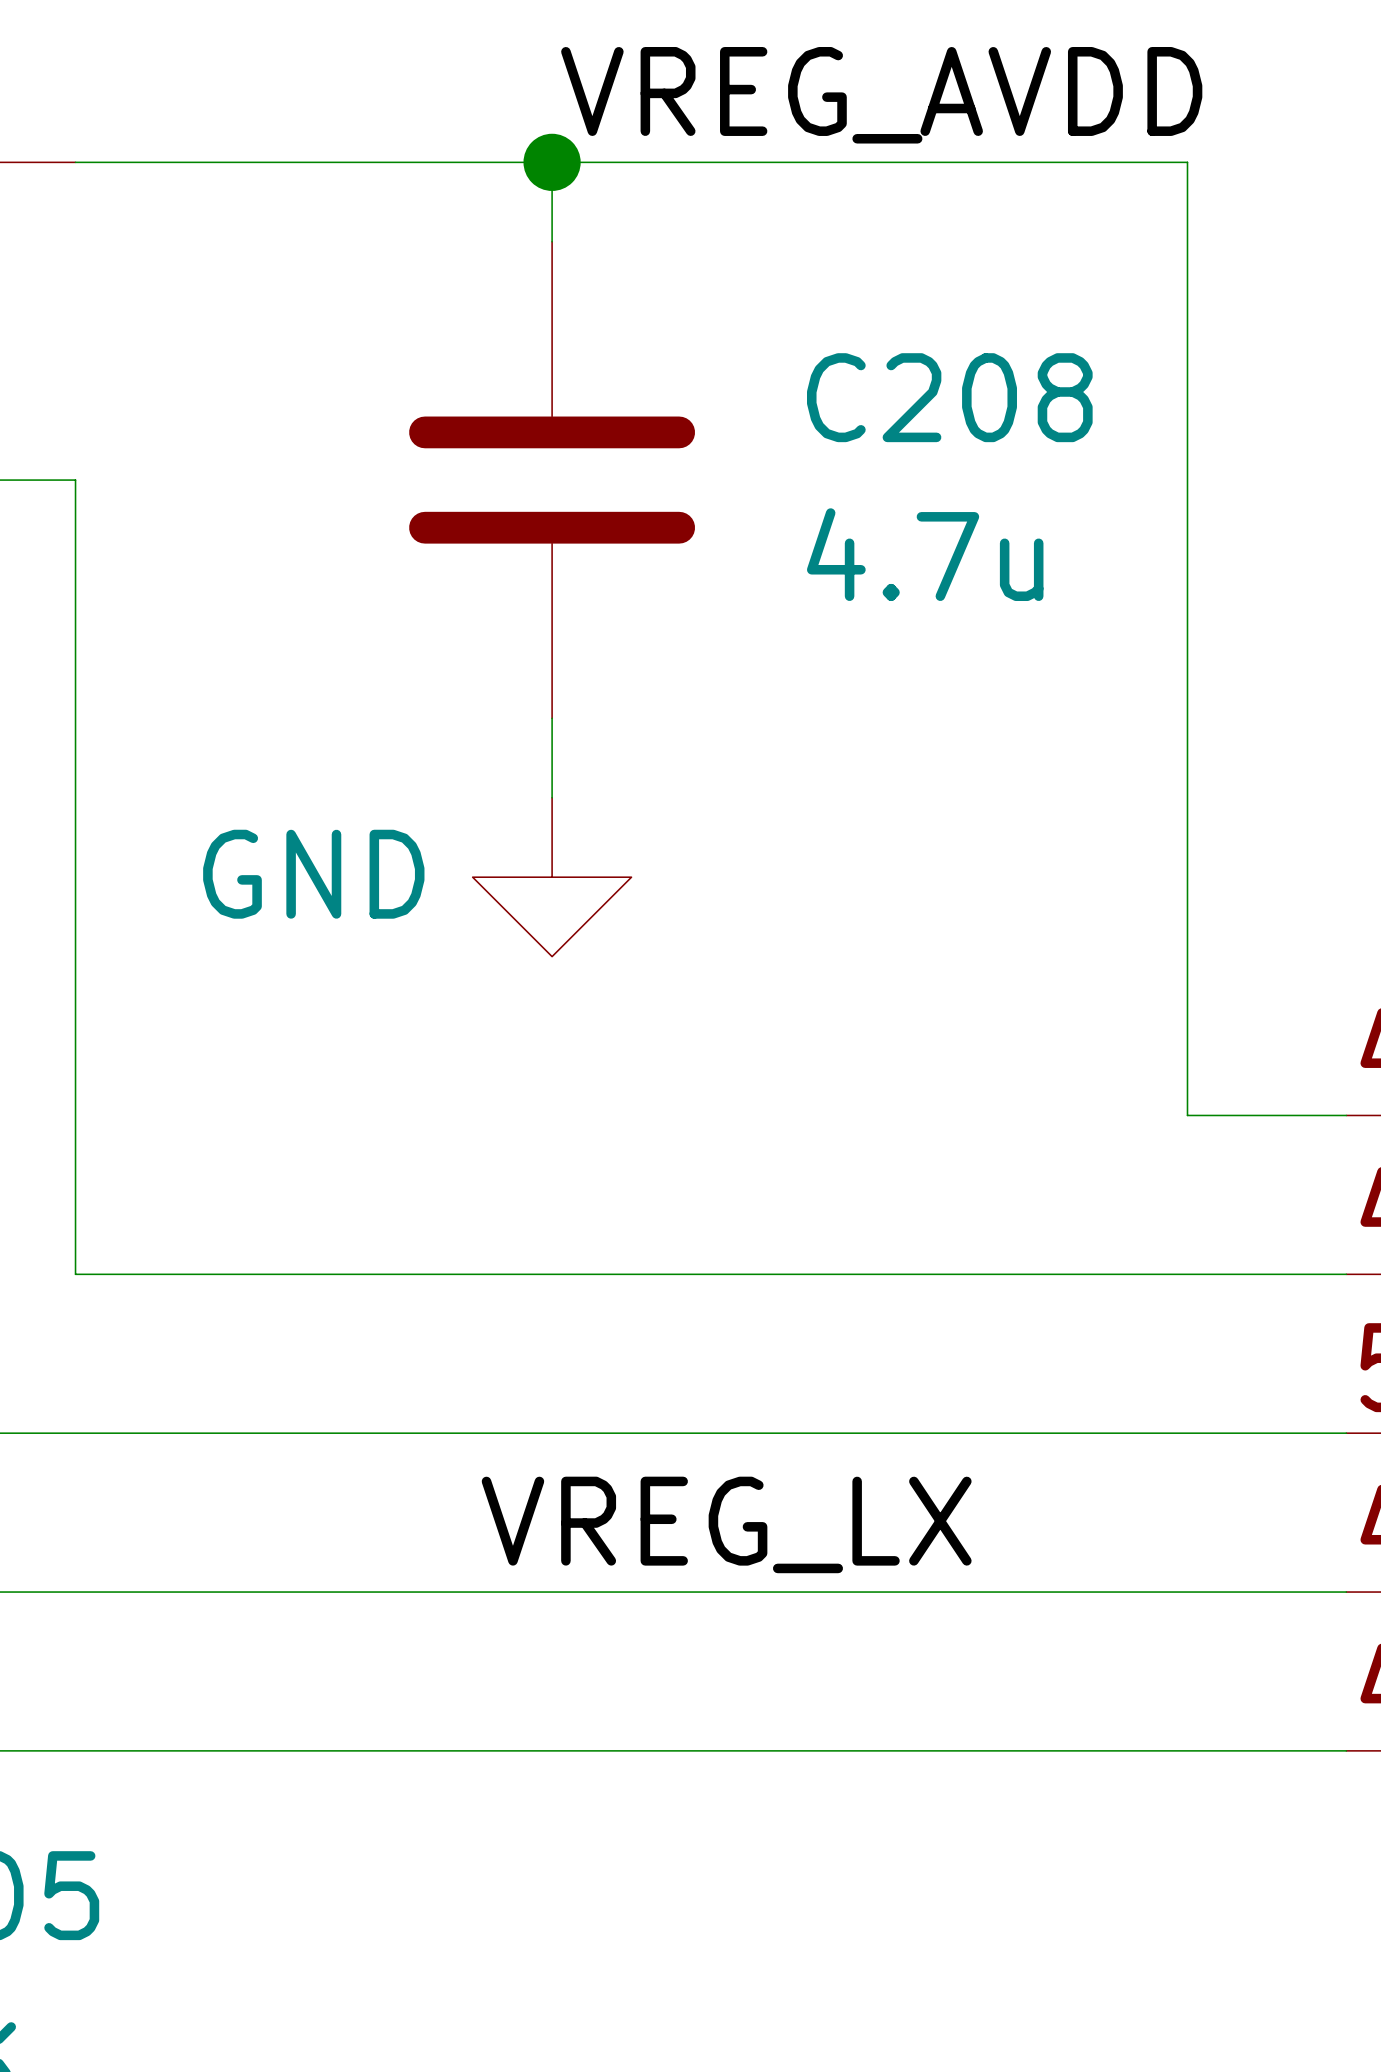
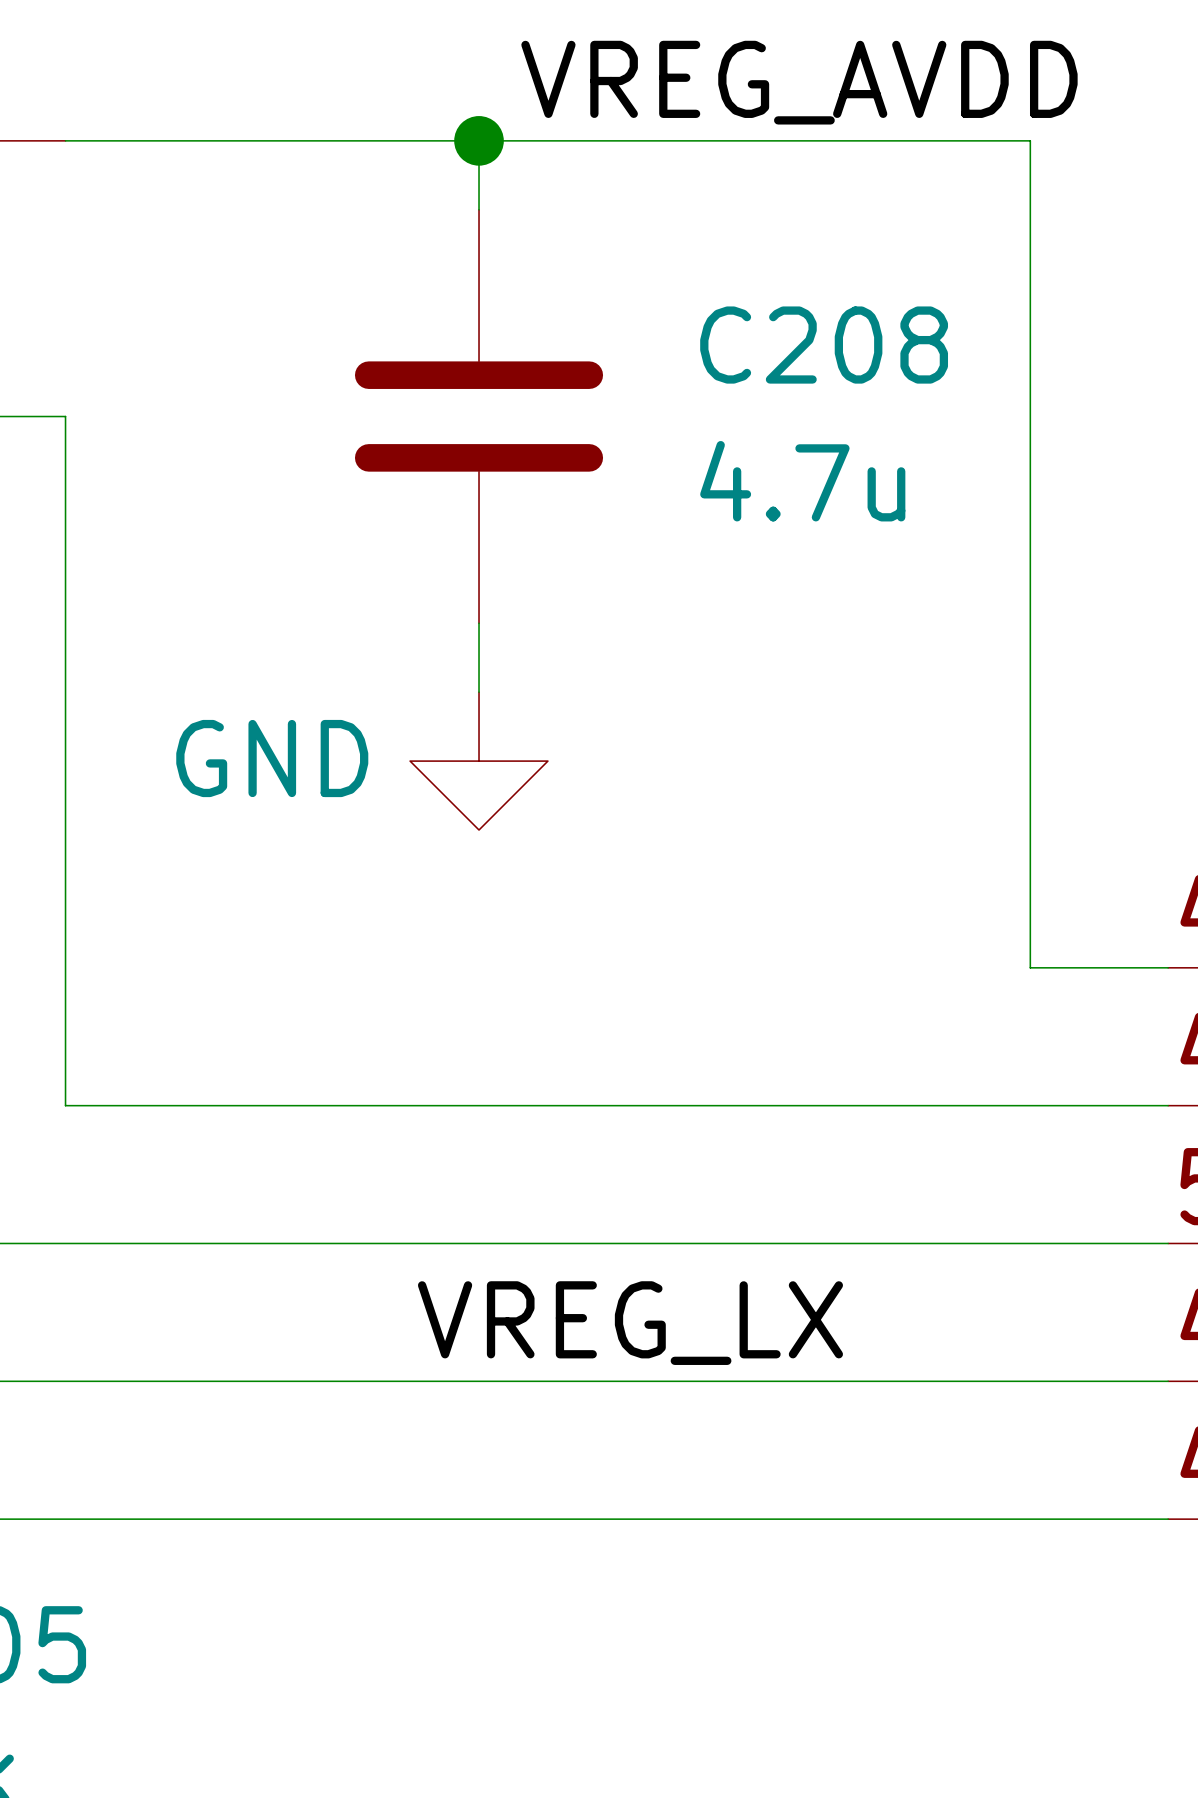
label position: VREG_AVDD (881, 95) -> VREG_AVDD (799, 82)

